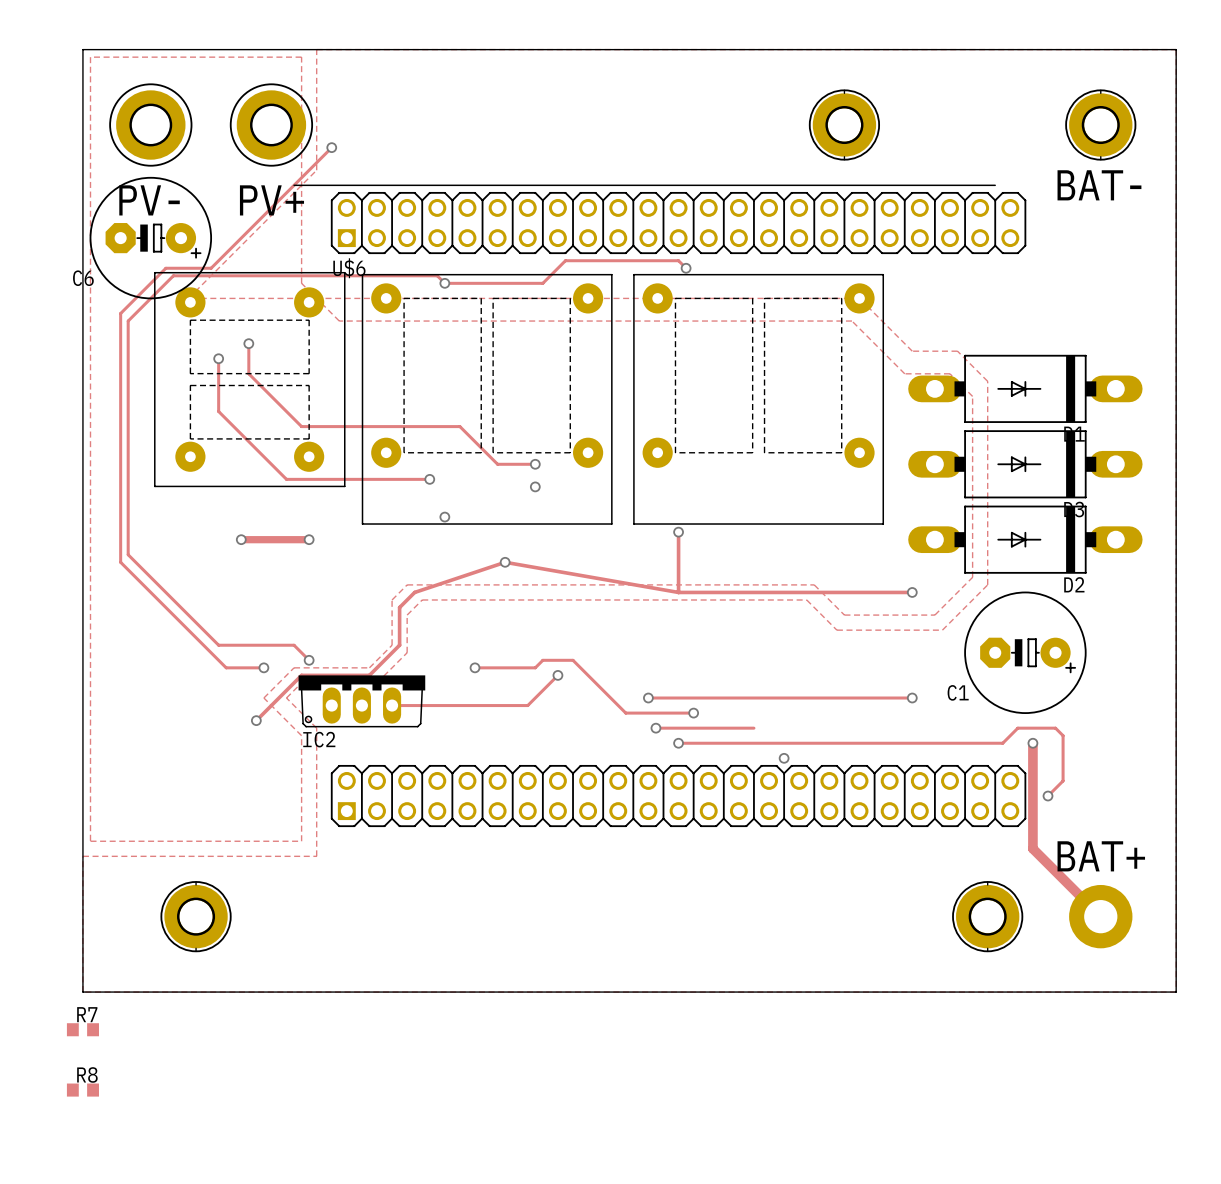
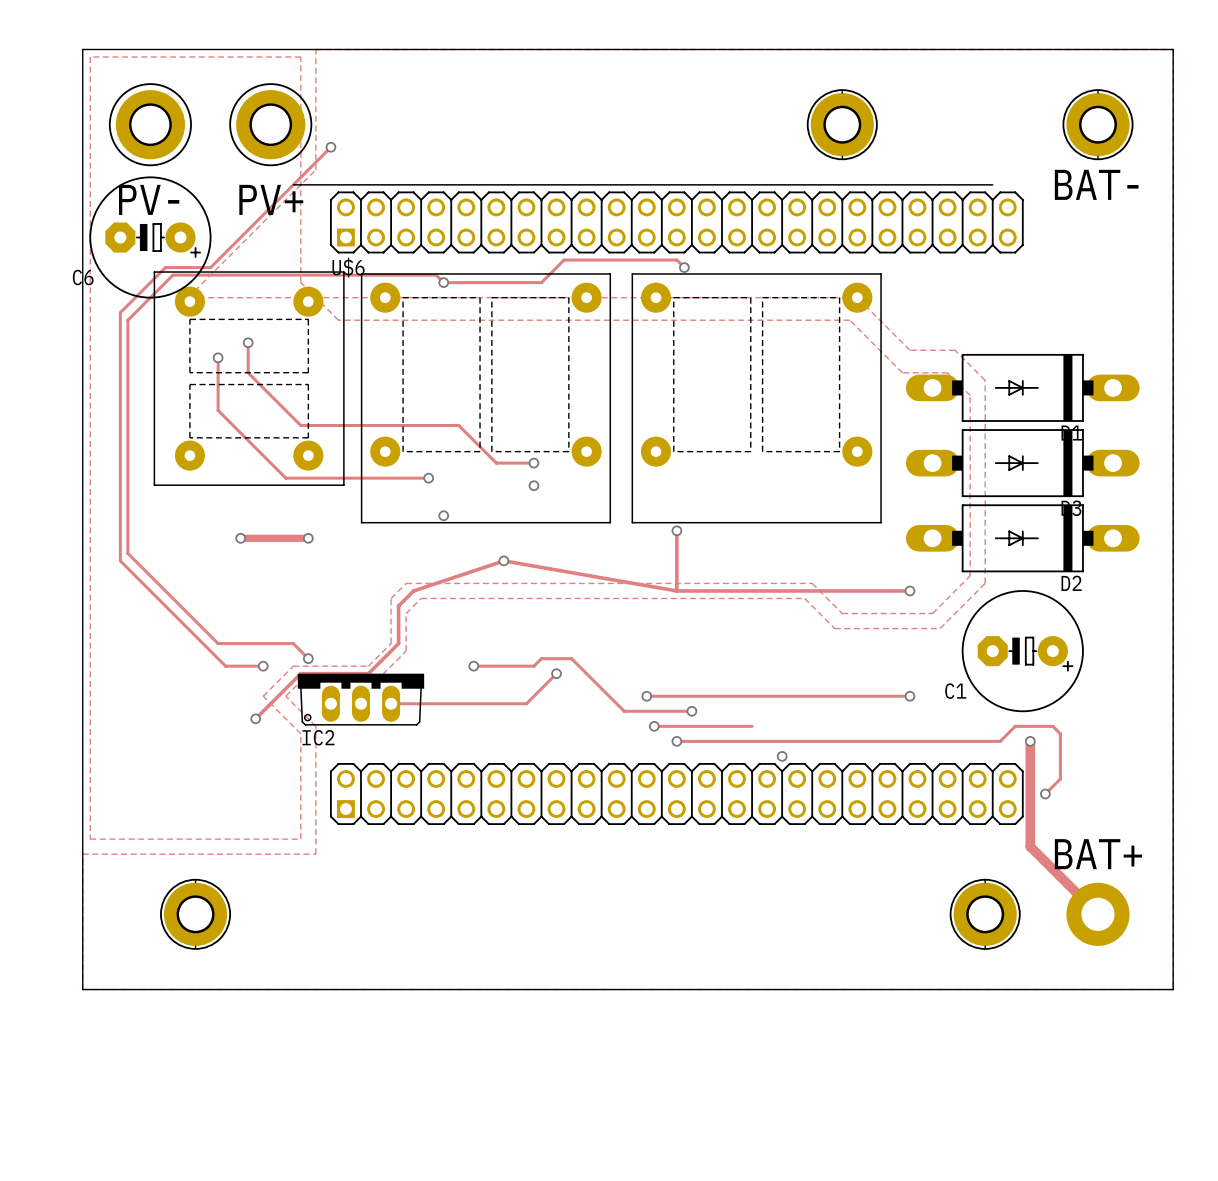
R7: (82, 1029) -> none
R8: (82, 1090) -> none

